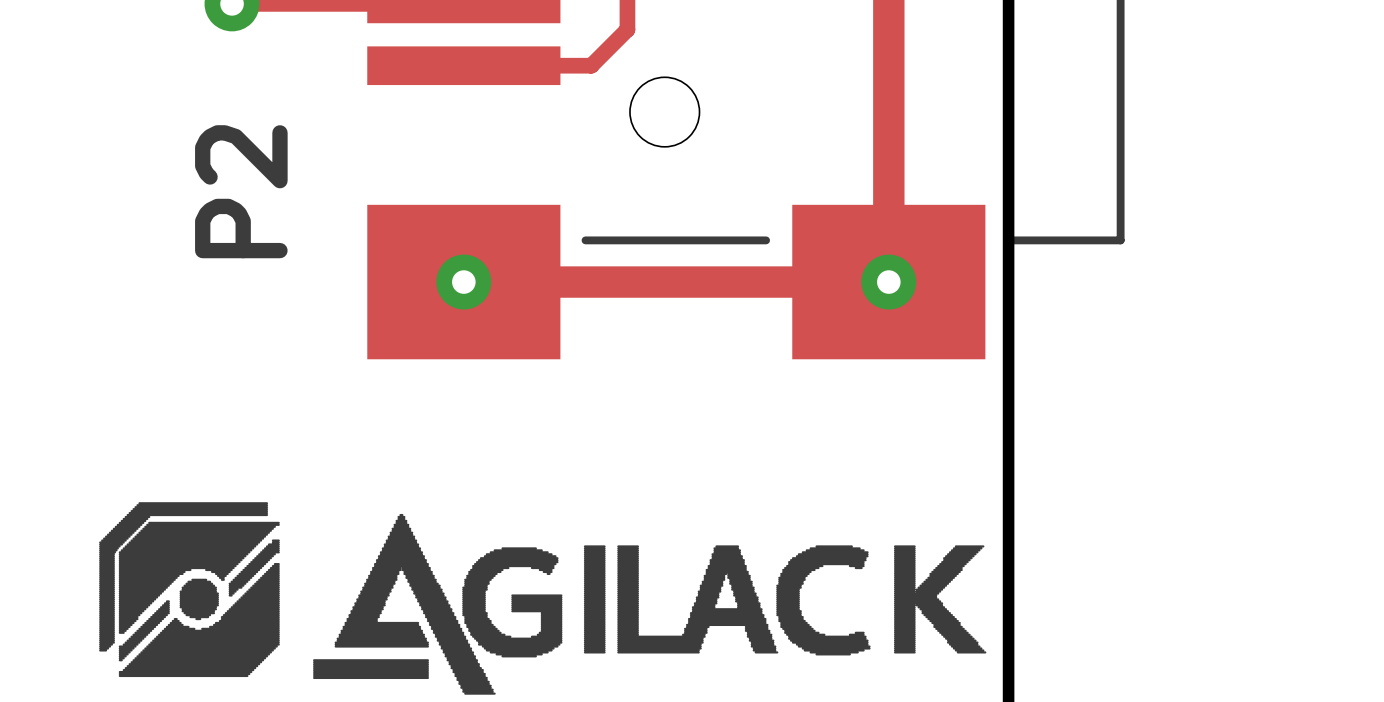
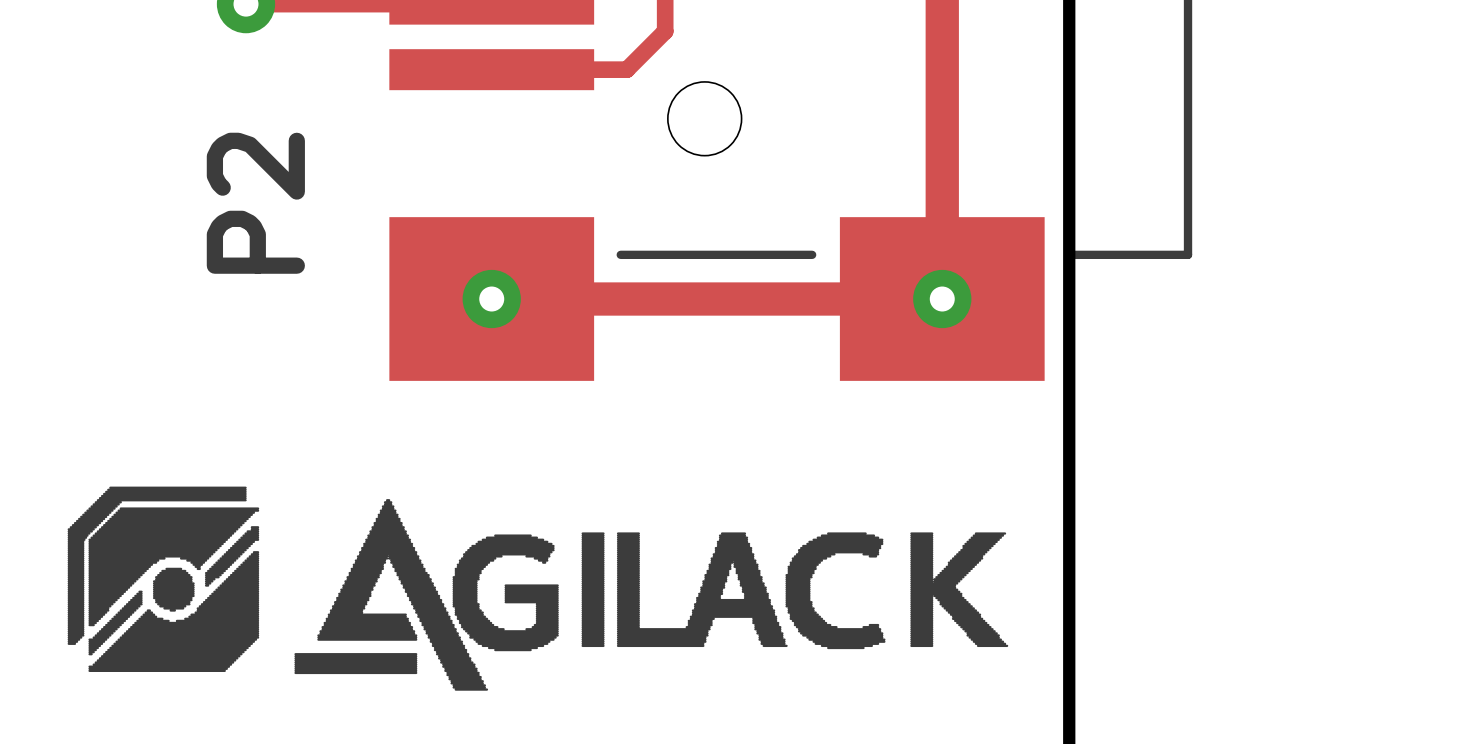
drawing position: (542, 598) -> (537, 588)

